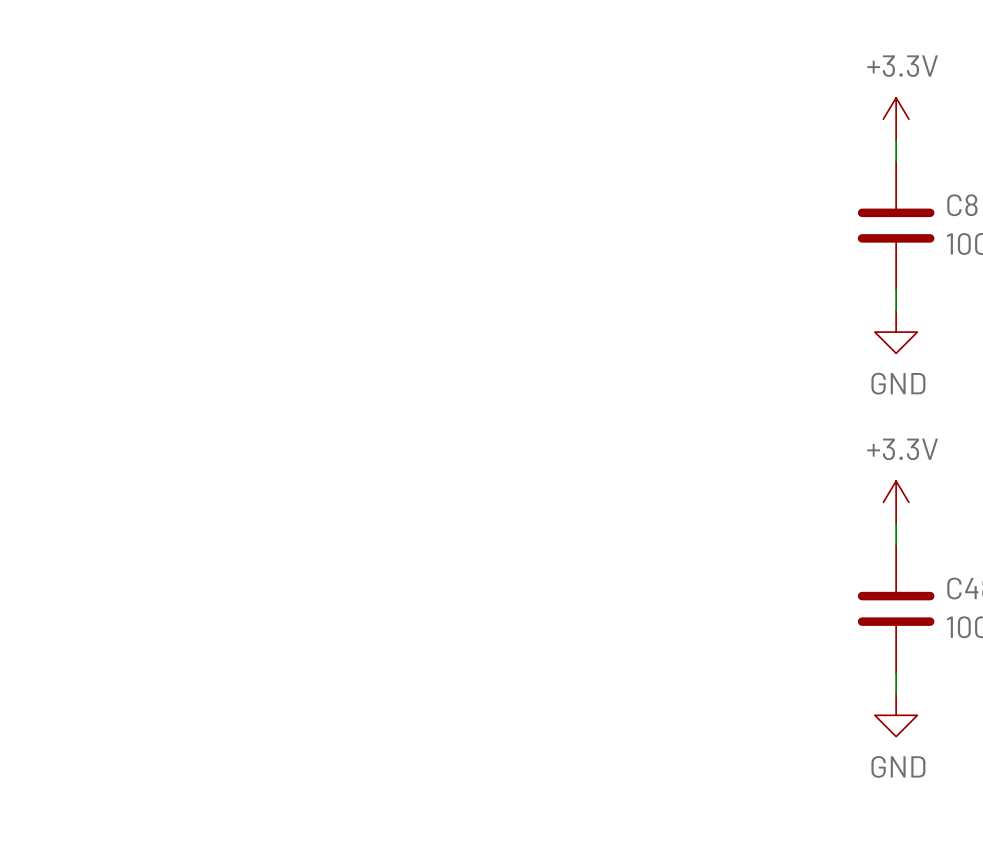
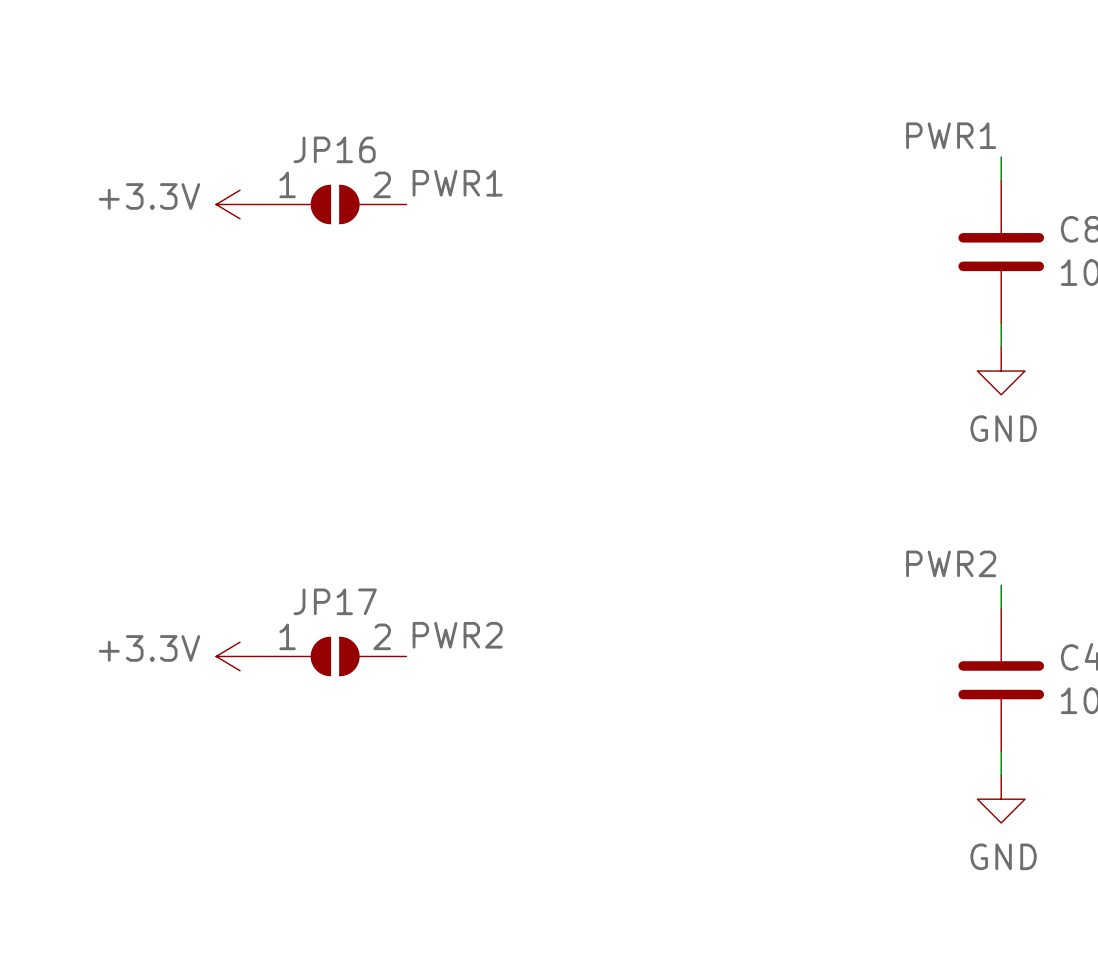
power symbol: +3.3V (896, 119) -> none
label: none -> PWR1 (951, 135)
label: none -> PWR1 (457, 183)
power symbol: none -> +3.3V (240, 204)
JP16: none -> (335, 204)
power symbol: +3.3V (896, 502) -> none
label: none -> PWR2 (951, 563)
label: none -> PWR2 (457, 635)
power symbol: none -> +3.3V (240, 656)
JP17: none -> (335, 656)

